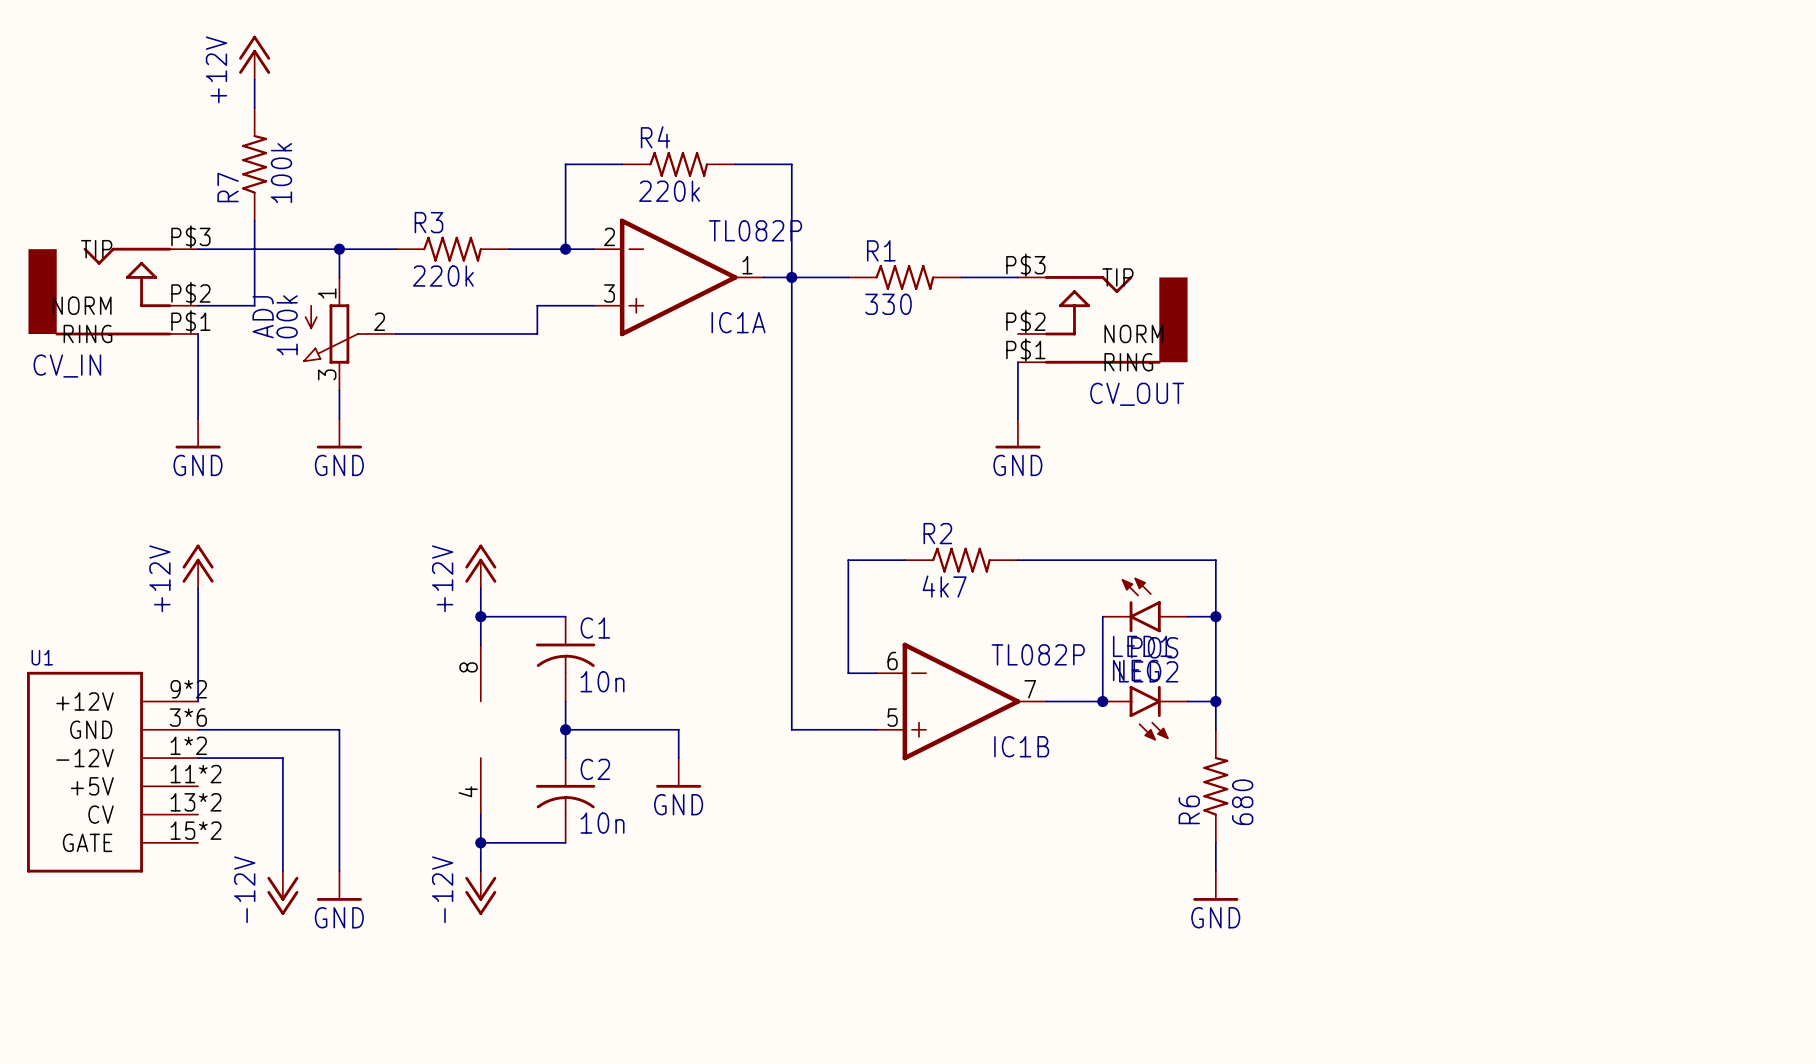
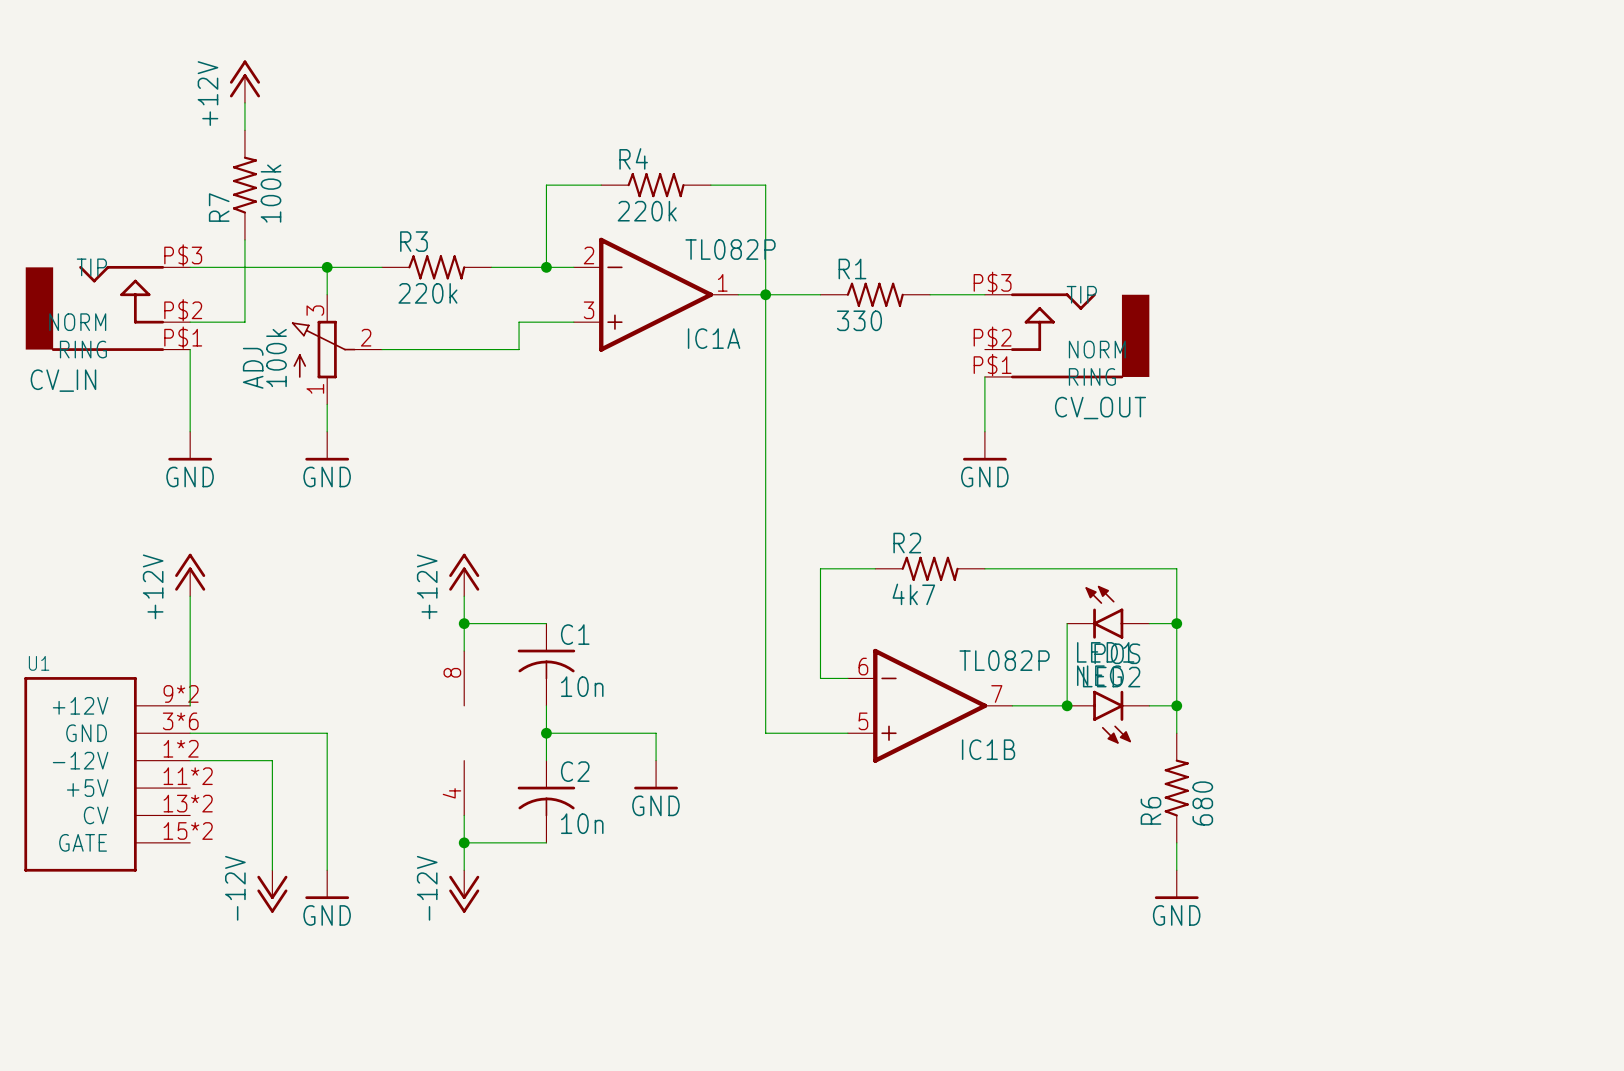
ADJ flip: as is (335, 333) -> up-down (323, 349)

